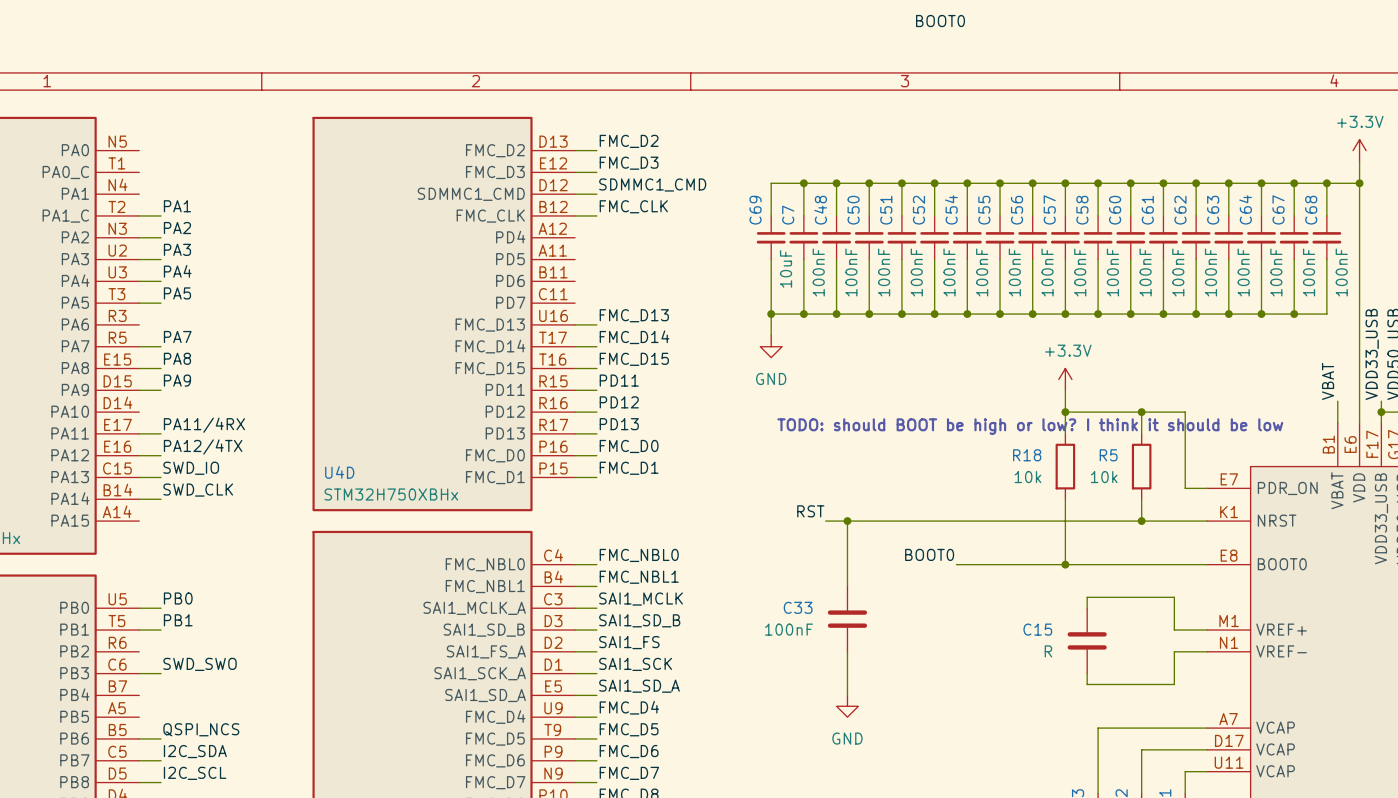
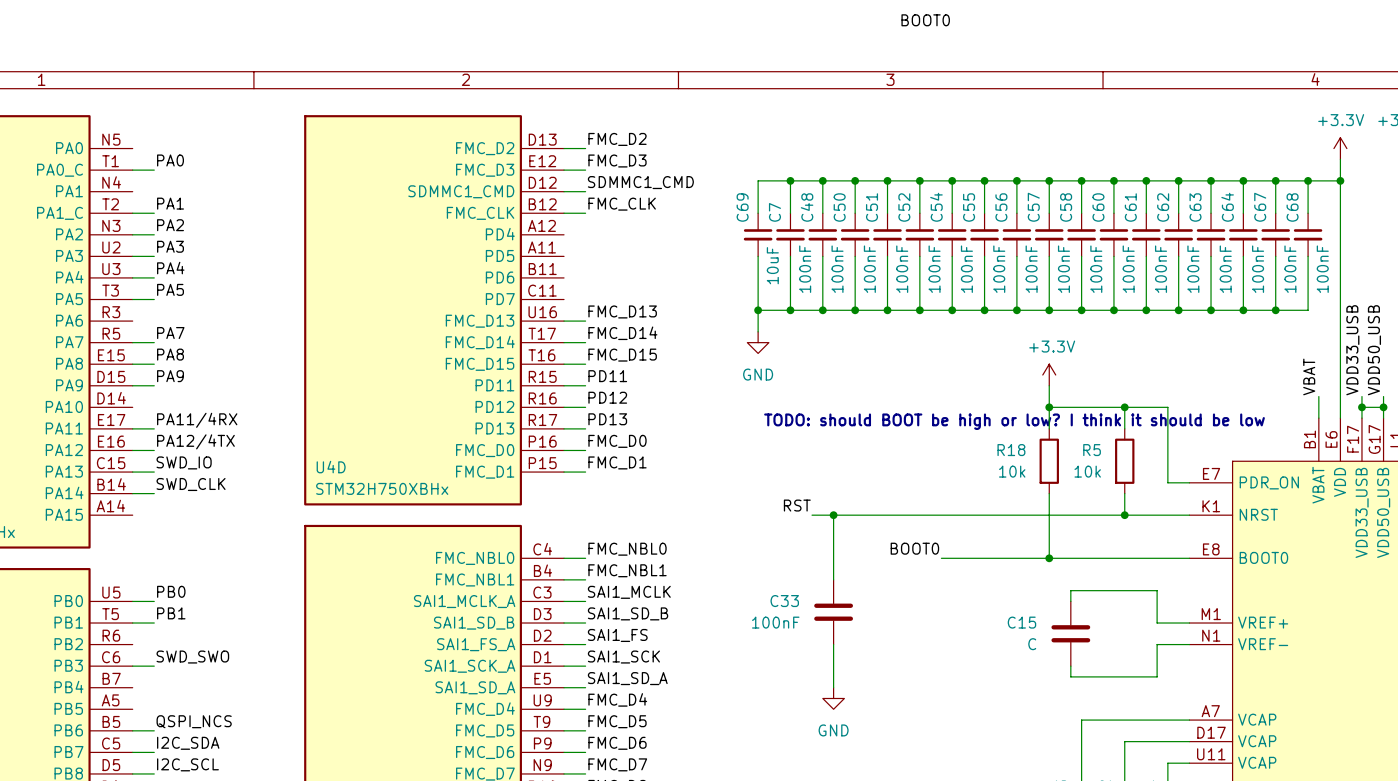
label: none -> PA0 (170, 160)
wire: none -> (132, 170) (154, 170)
C15 value: R (1048, 651) -> C (1032, 644)

